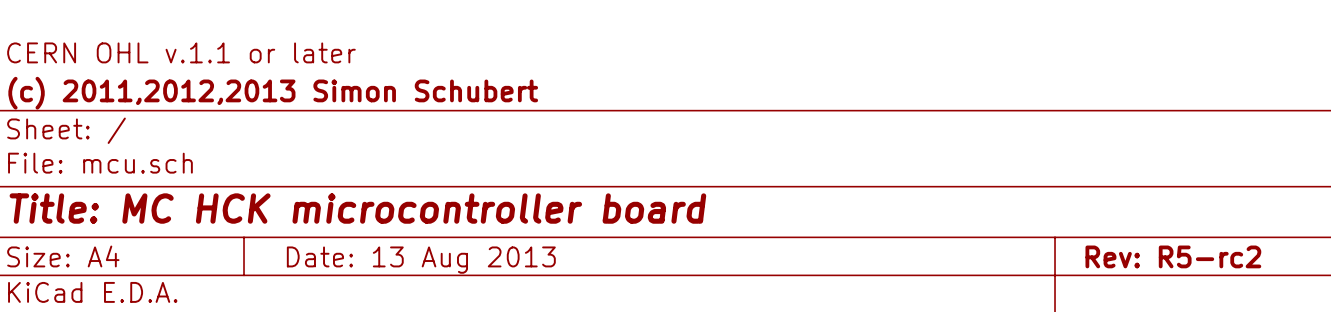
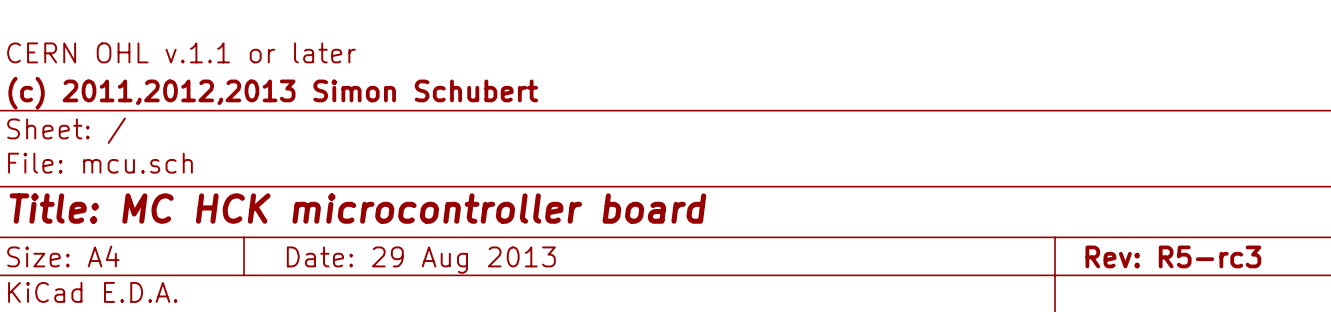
title block: Rev: R5-rc2 (1173, 256) -> Rev: R5-rc3 (1173, 256)
title block: Date: 13 Aug 2013 (421, 260) -> Date: 29 Aug 2013 (421, 260)

